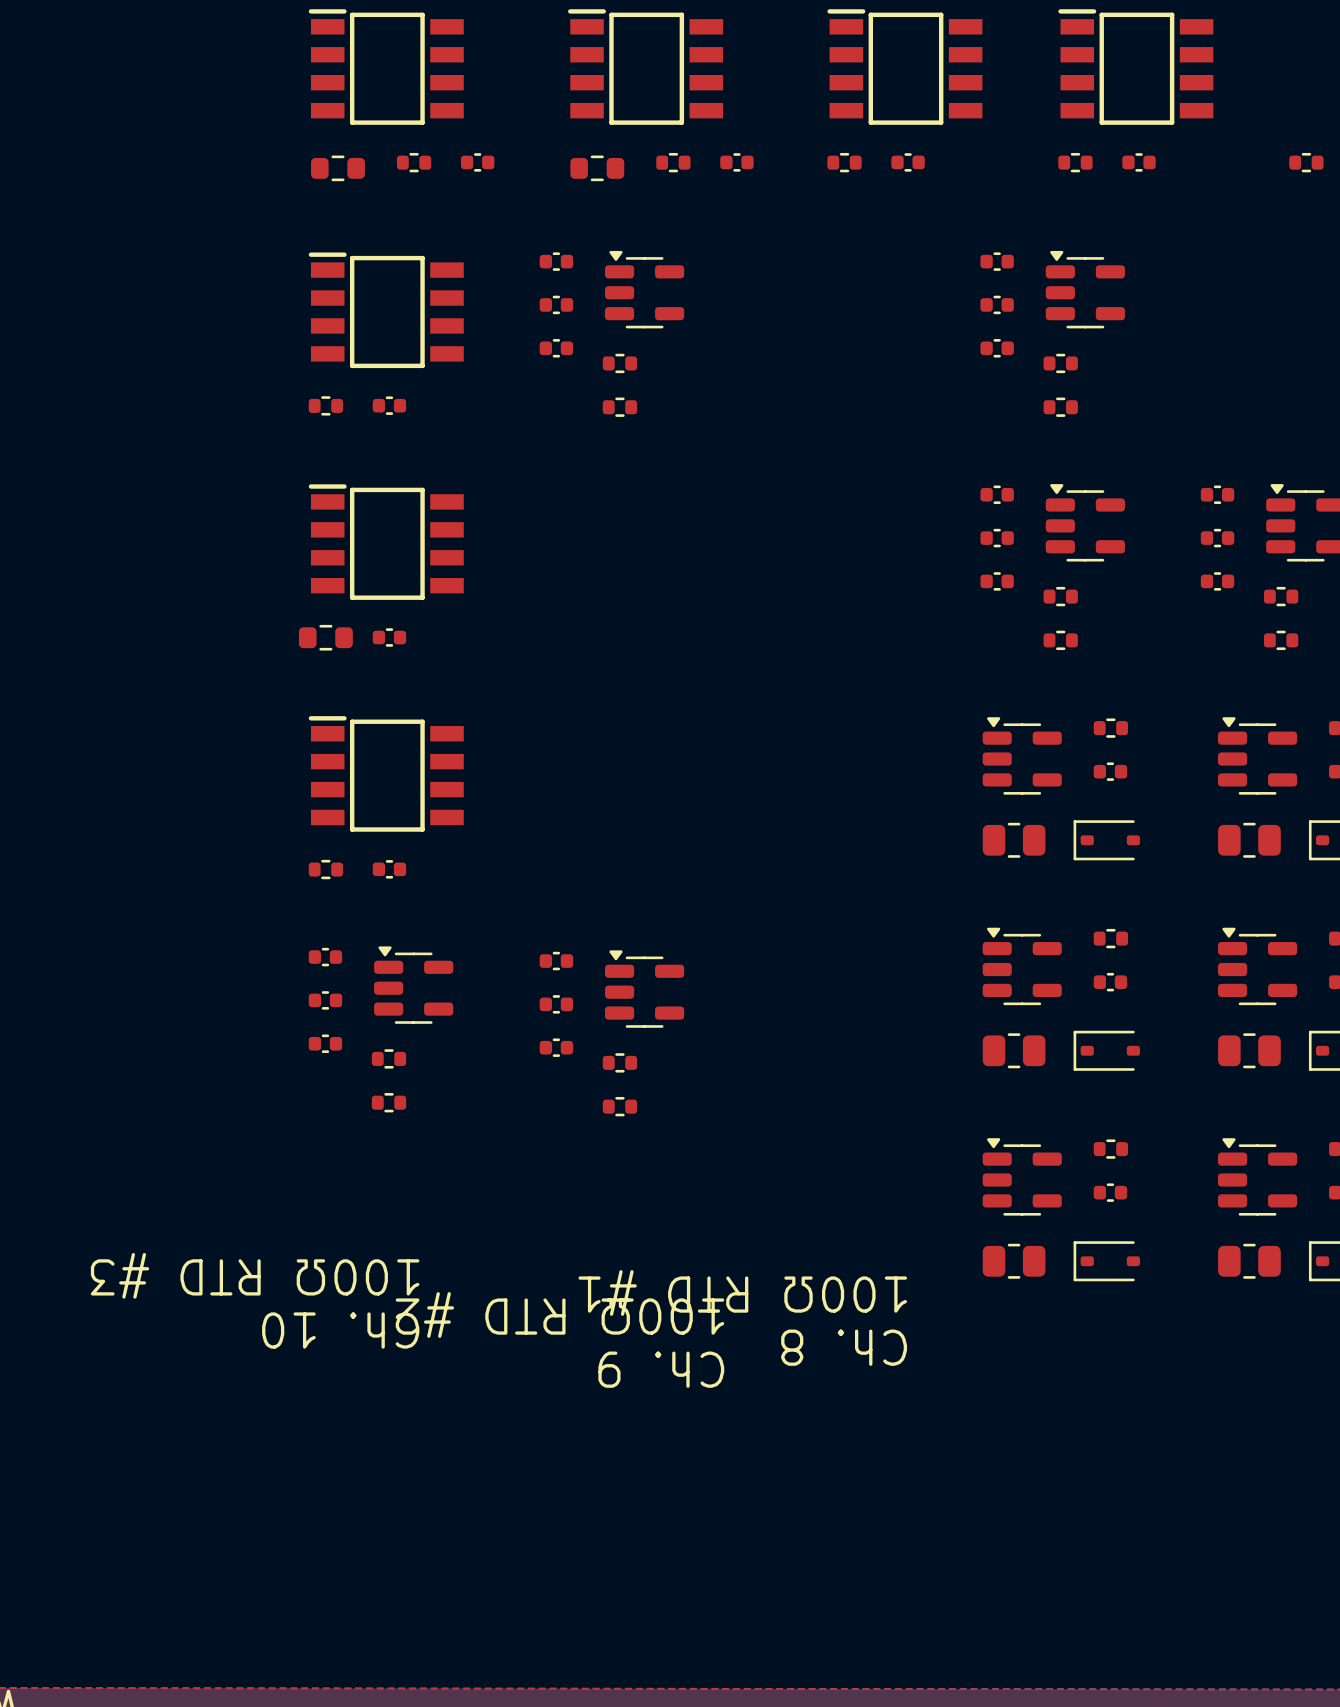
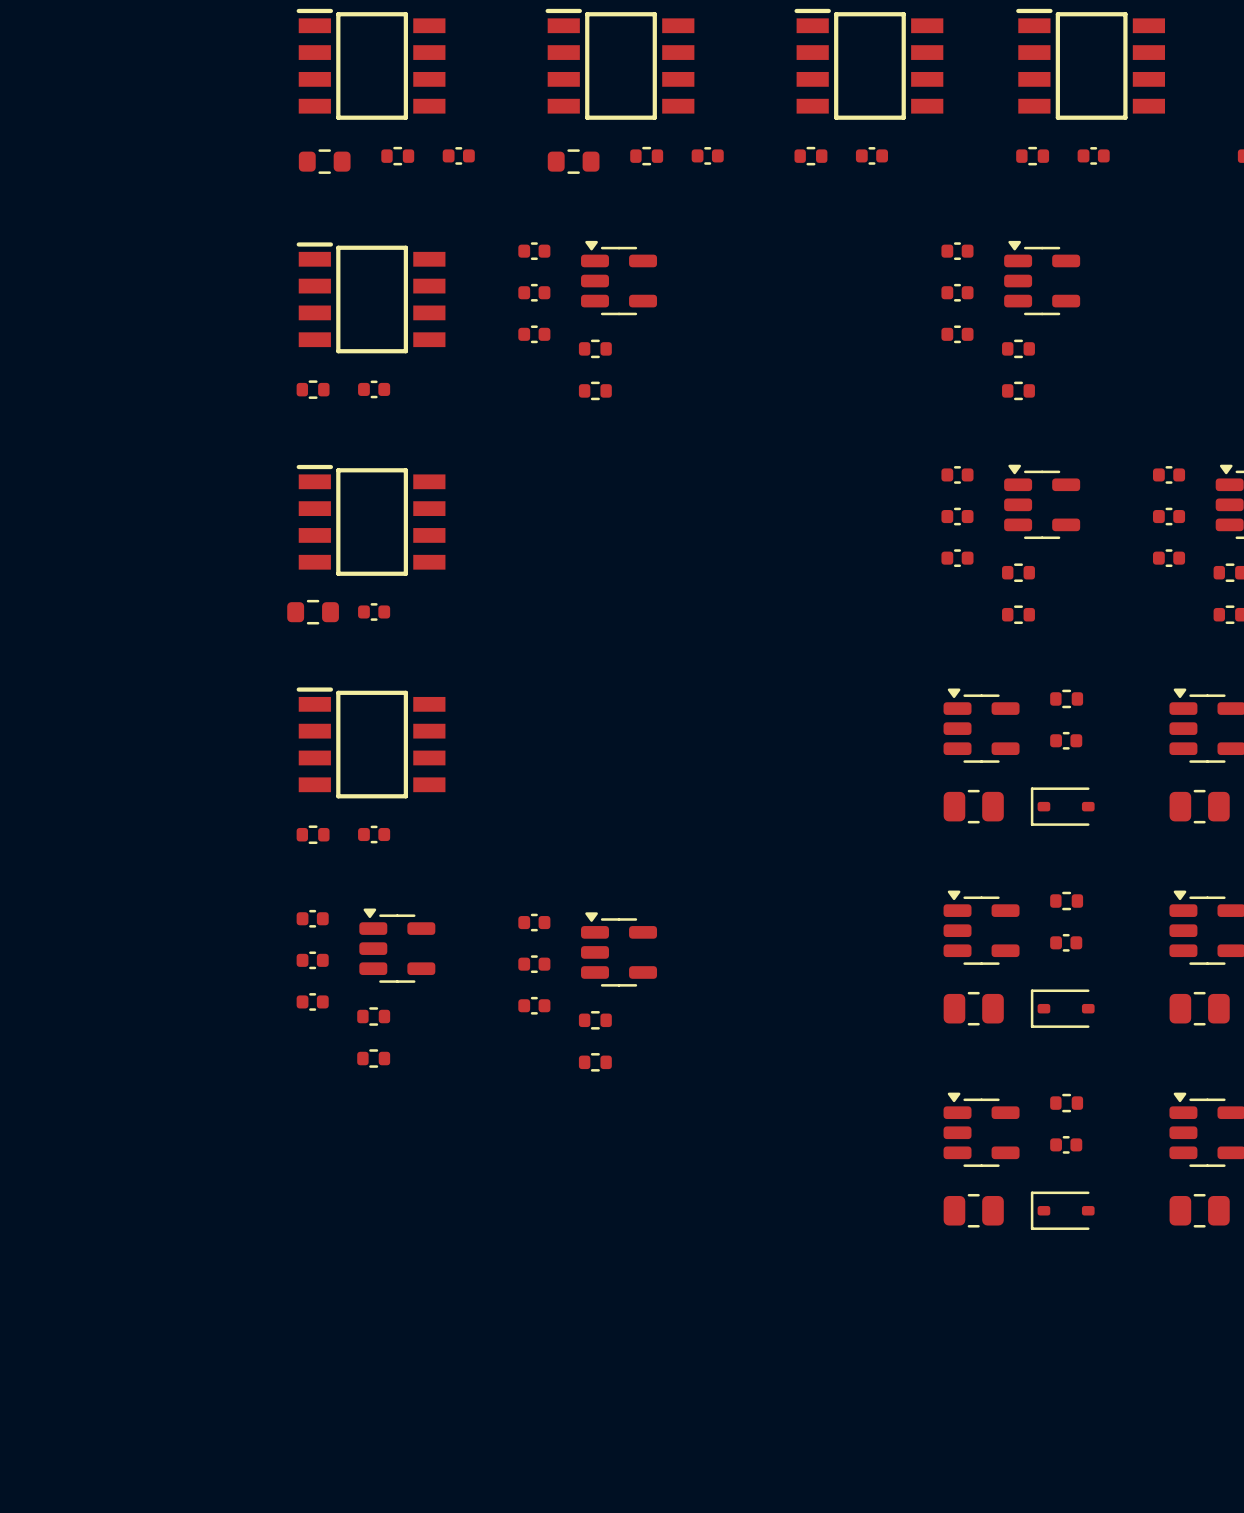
text: 100Ω RTD #3 (255, 1275) -> none
text: 100Ω RTD #1 (742, 1292) -> none
text: 100Ω RTD #2 (559, 1314) -> none
text: Ch. 10 (340, 1330) -> none
text: Ch. 8 (844, 1347) -> none
text: Ch. 9 (661, 1369) -> none

